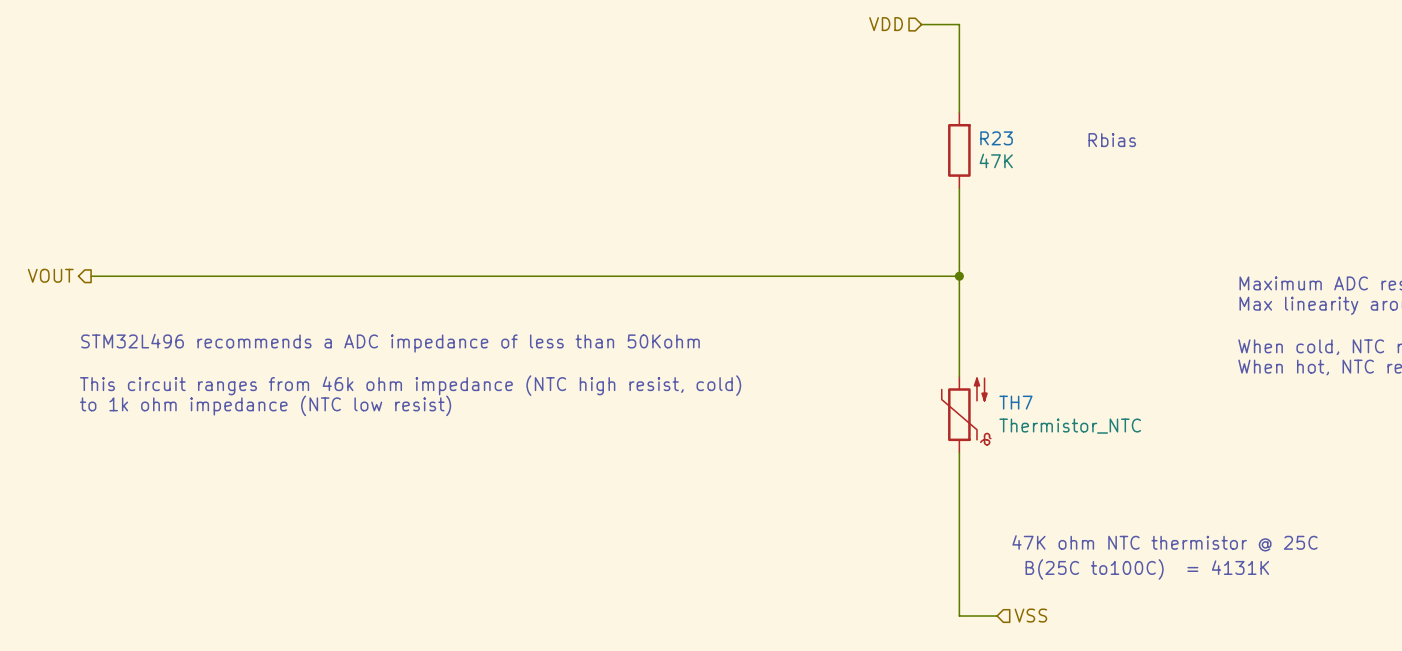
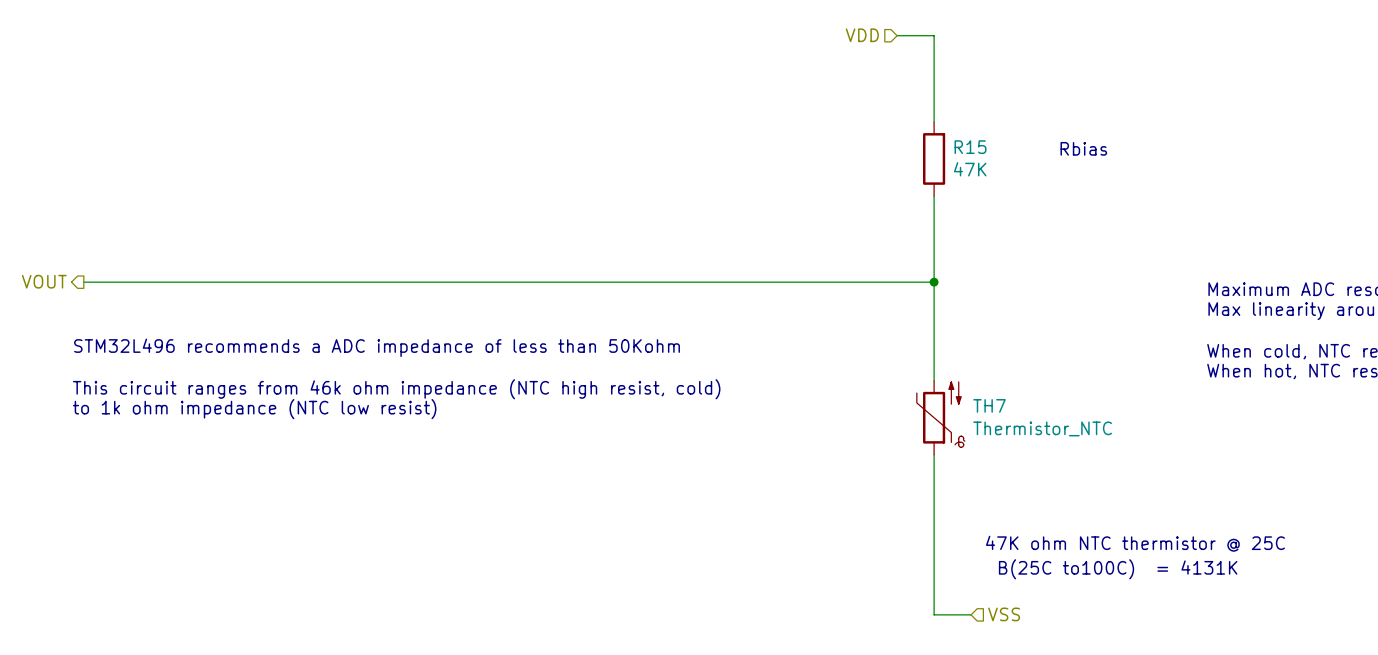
R23 name: R23 (996, 138) -> R15 (970, 147)

